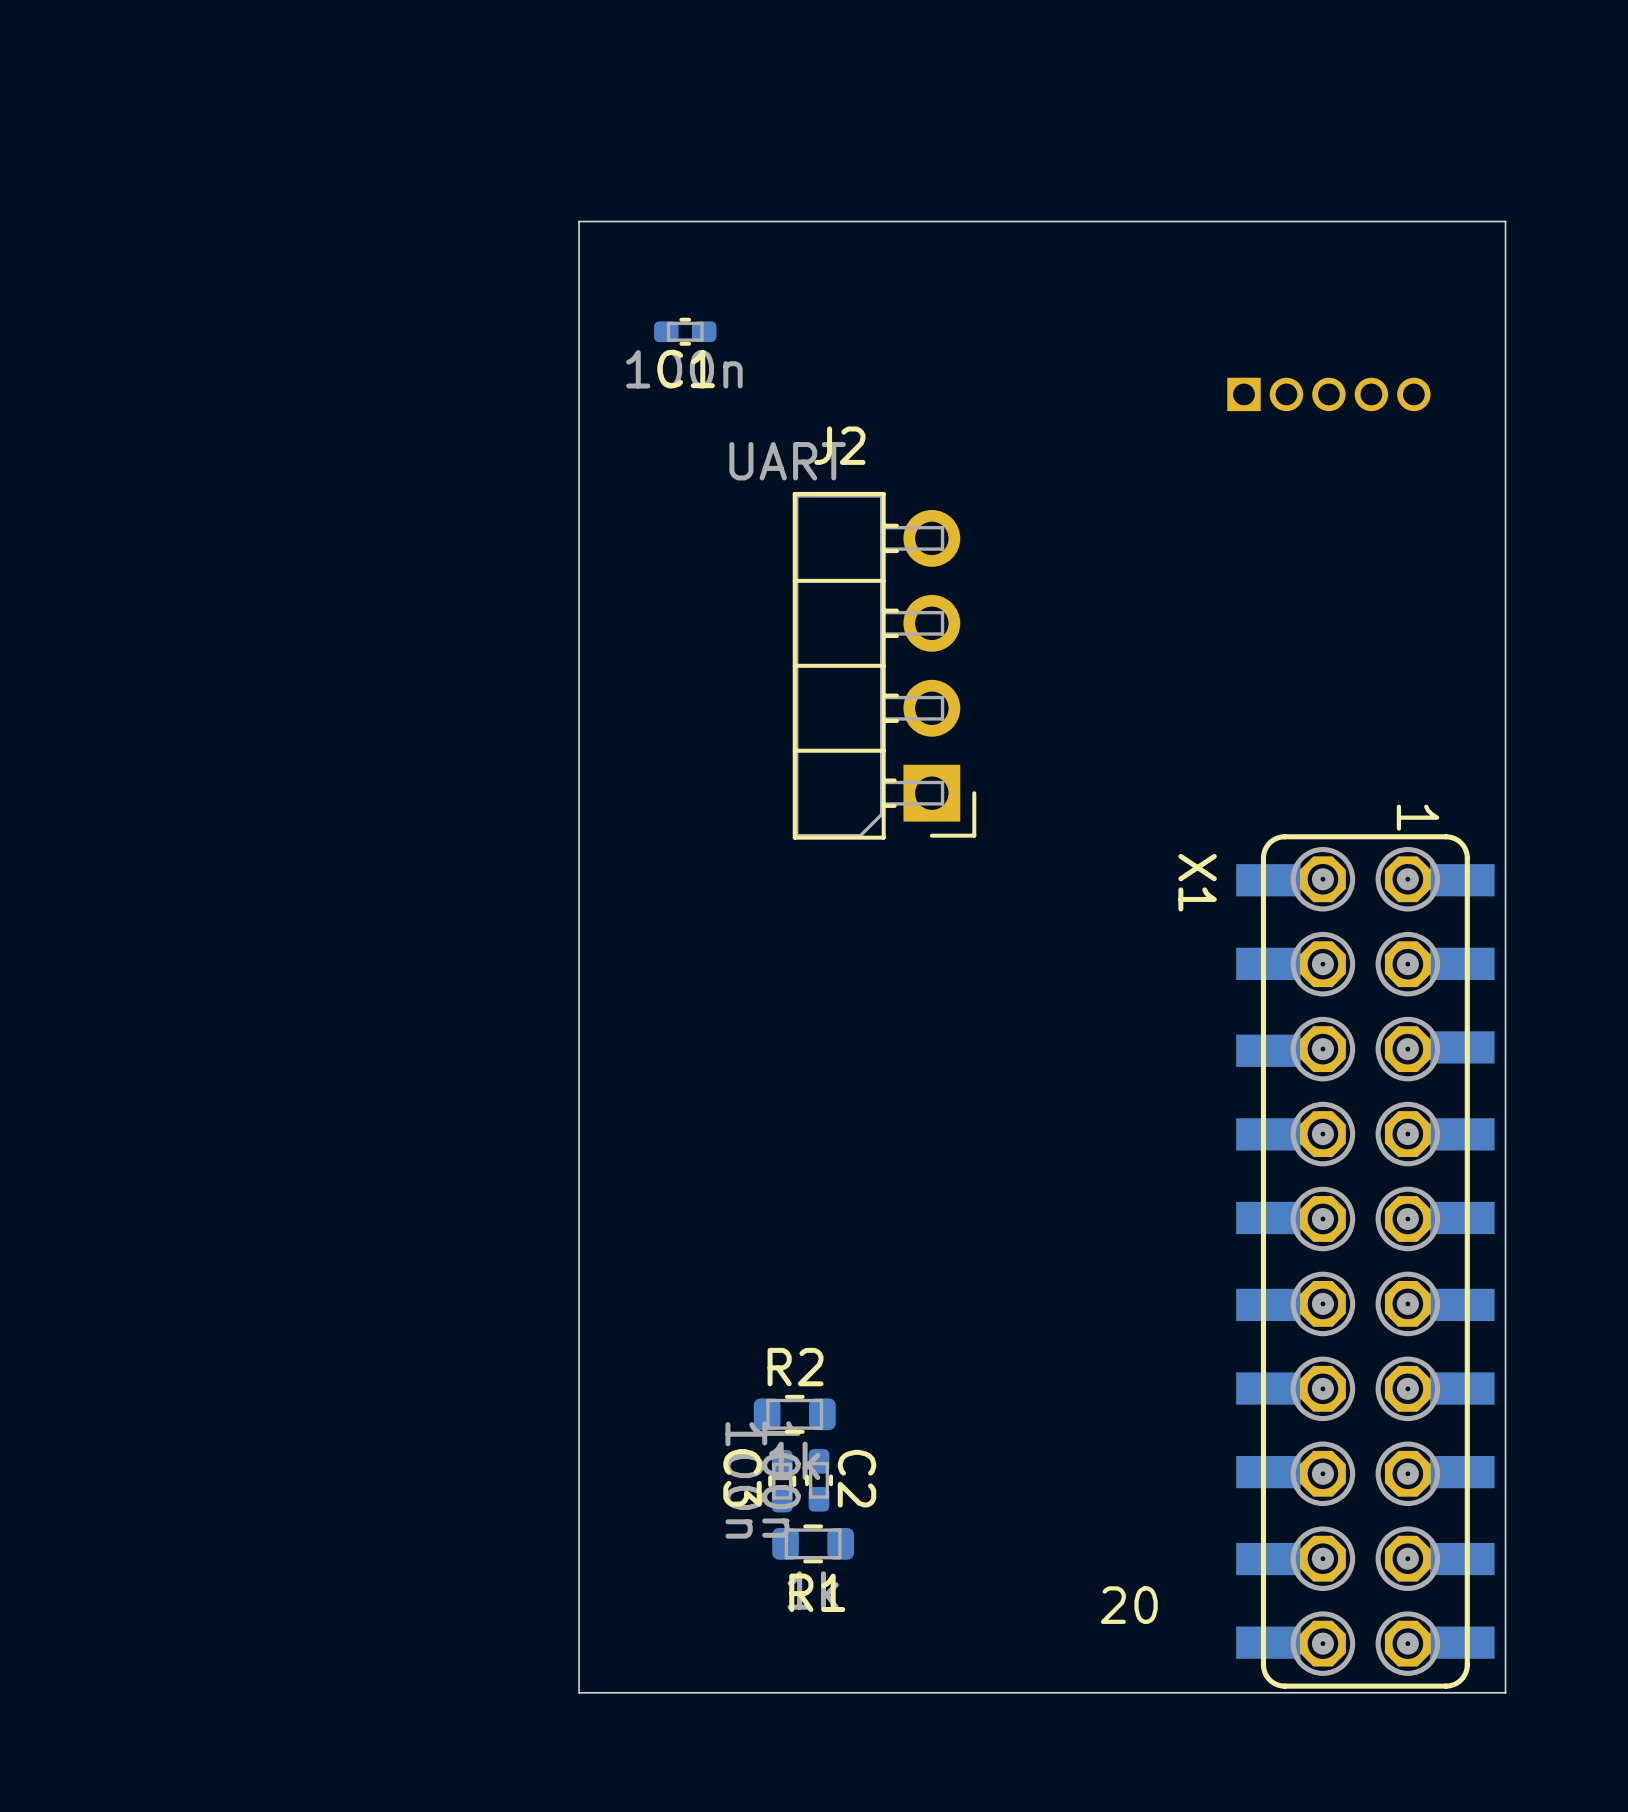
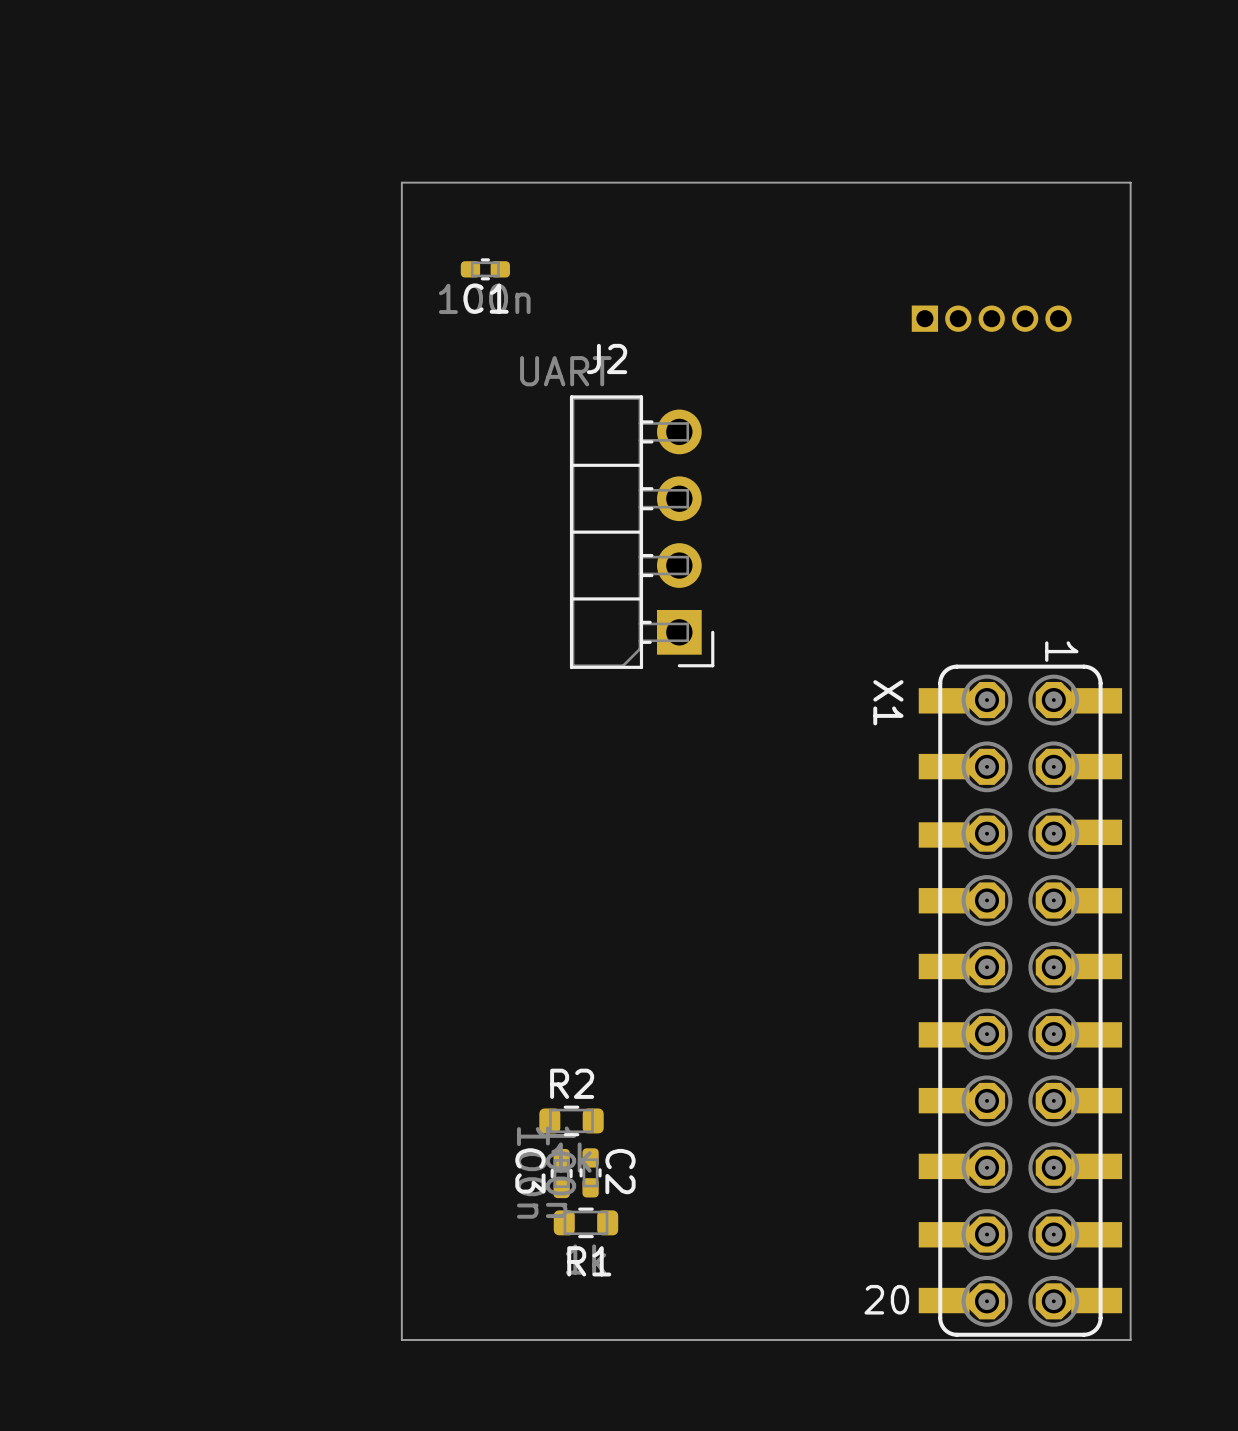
X1 text position: 20 (1129, 1605) -> 20 (886, 1299)

